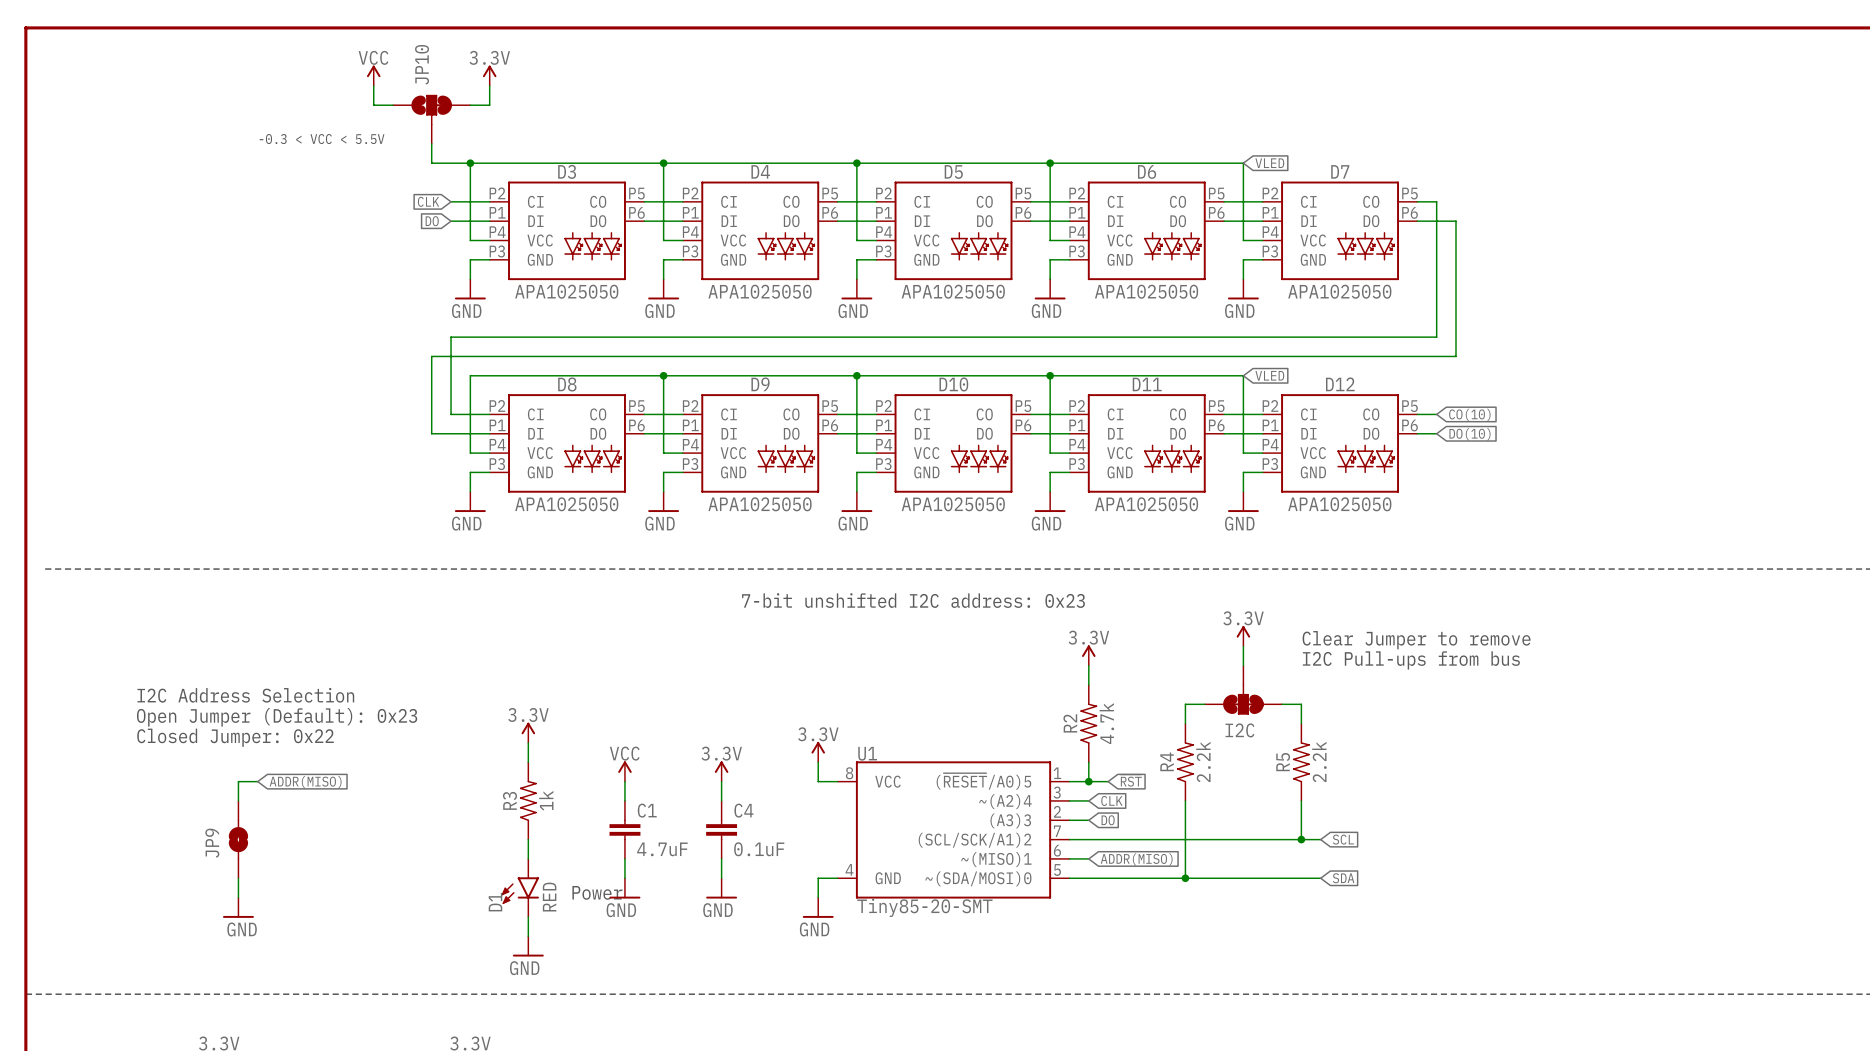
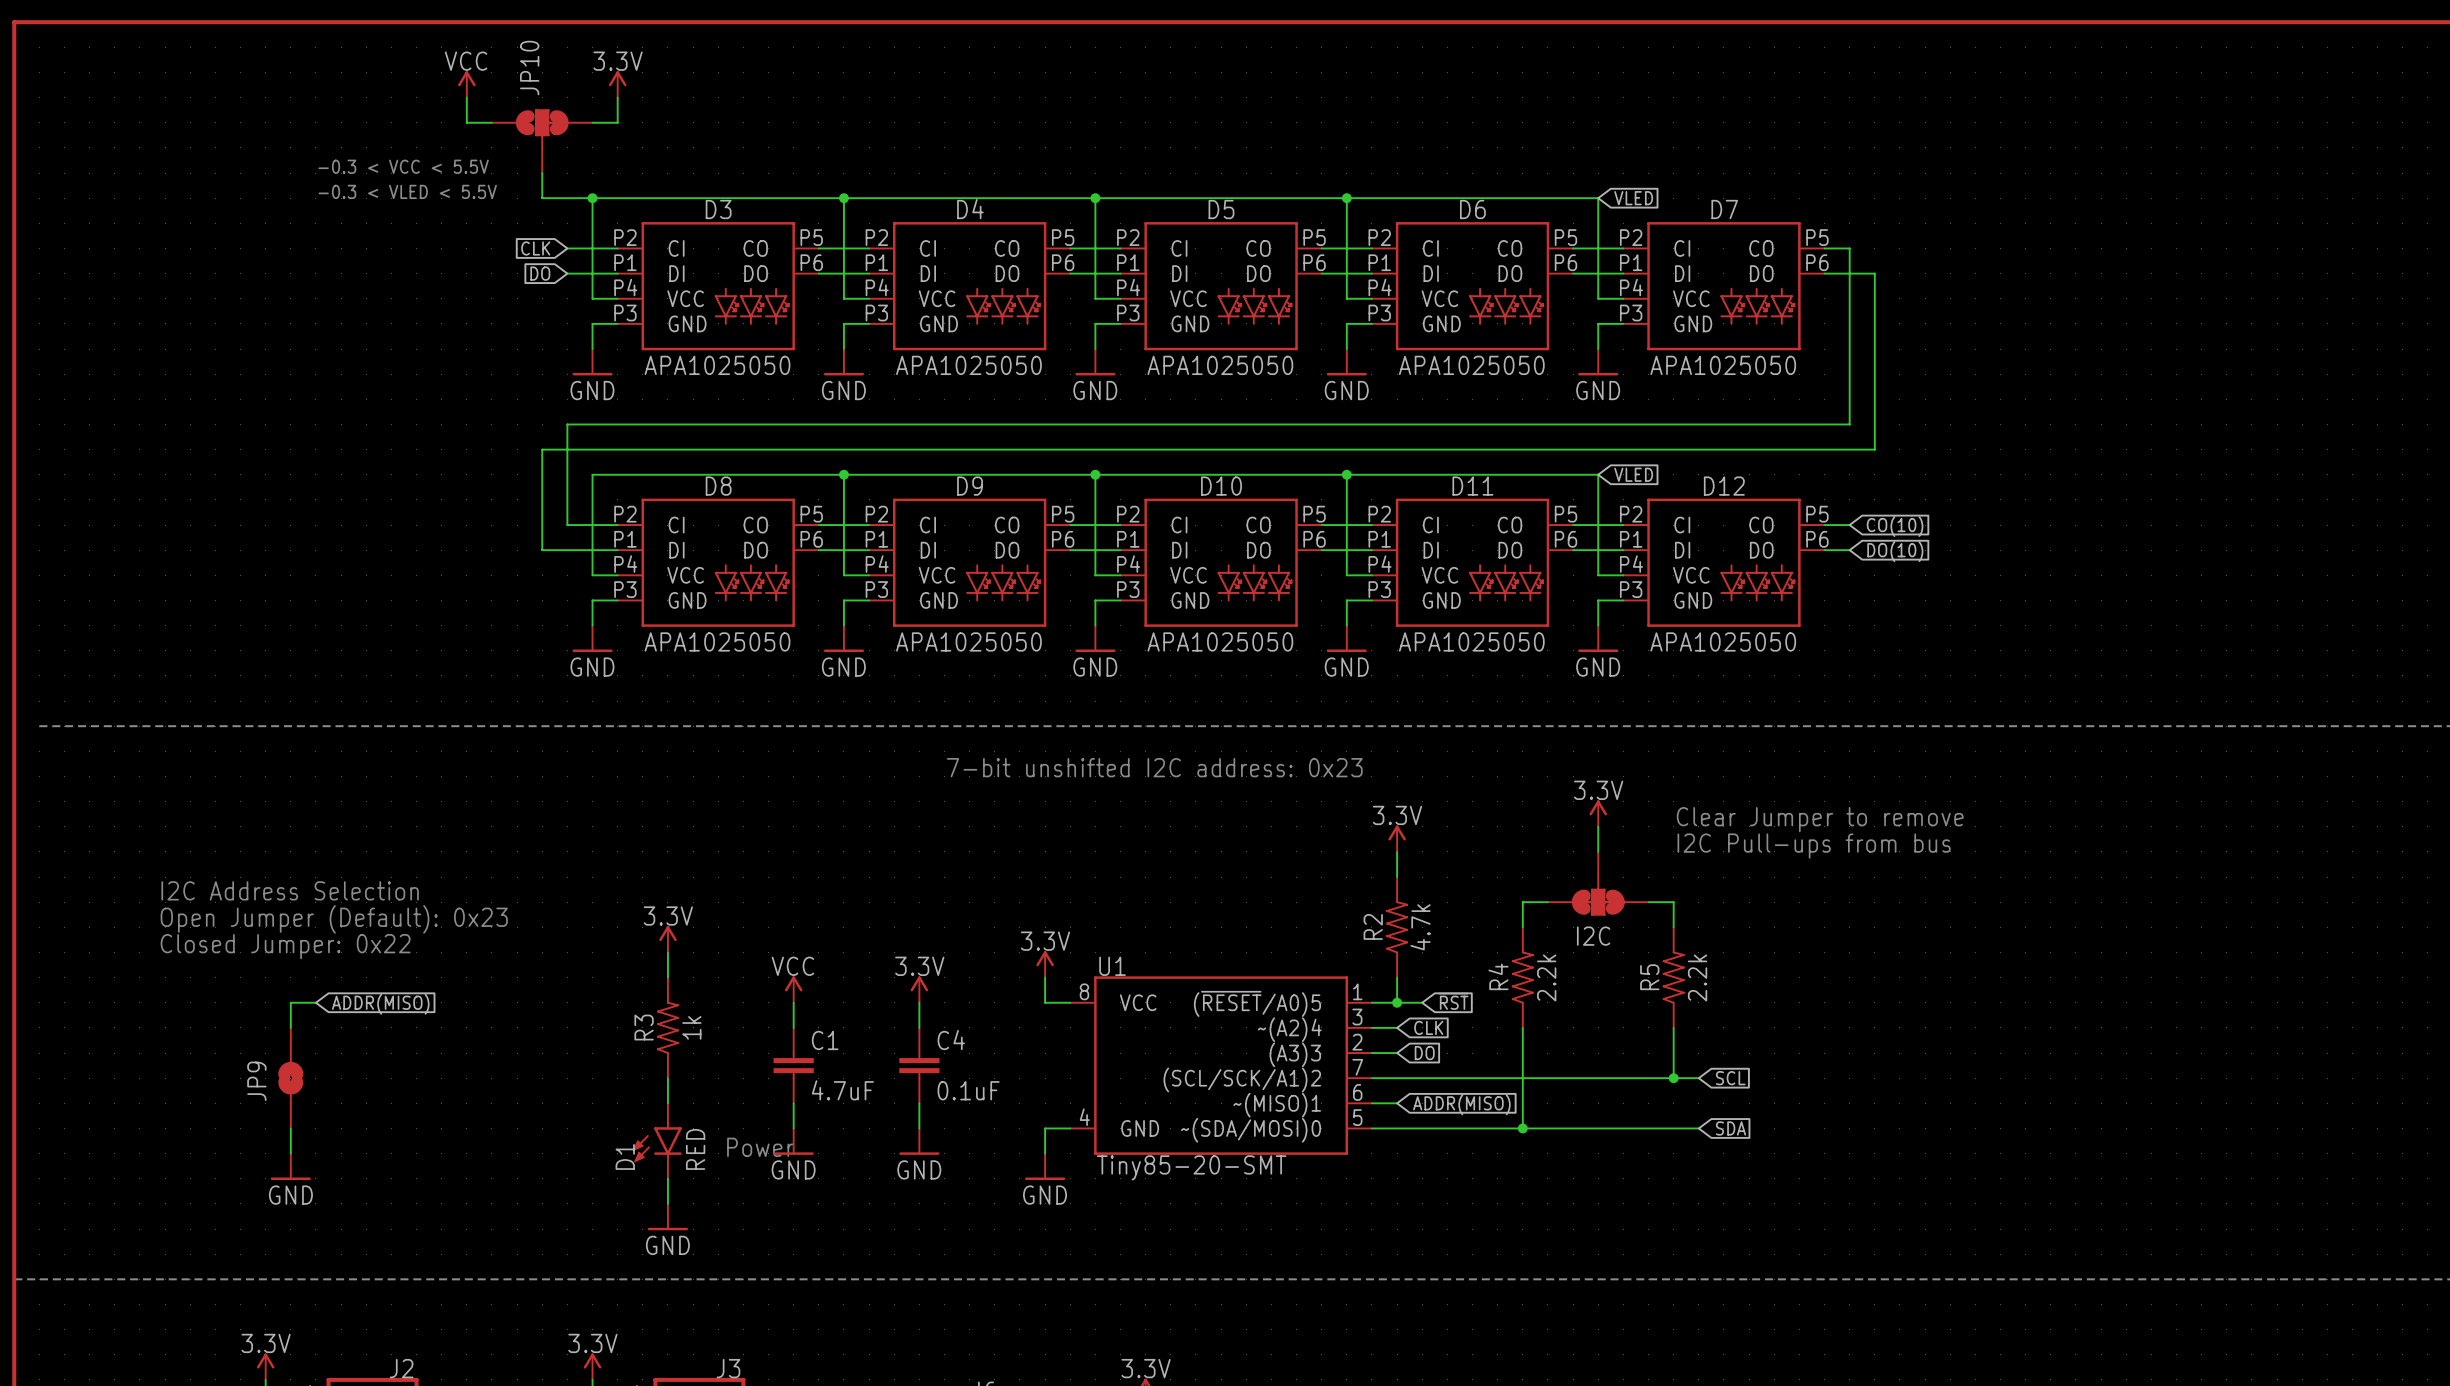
text: none -> -0.3 < VLED < 5.5V (407, 191)

